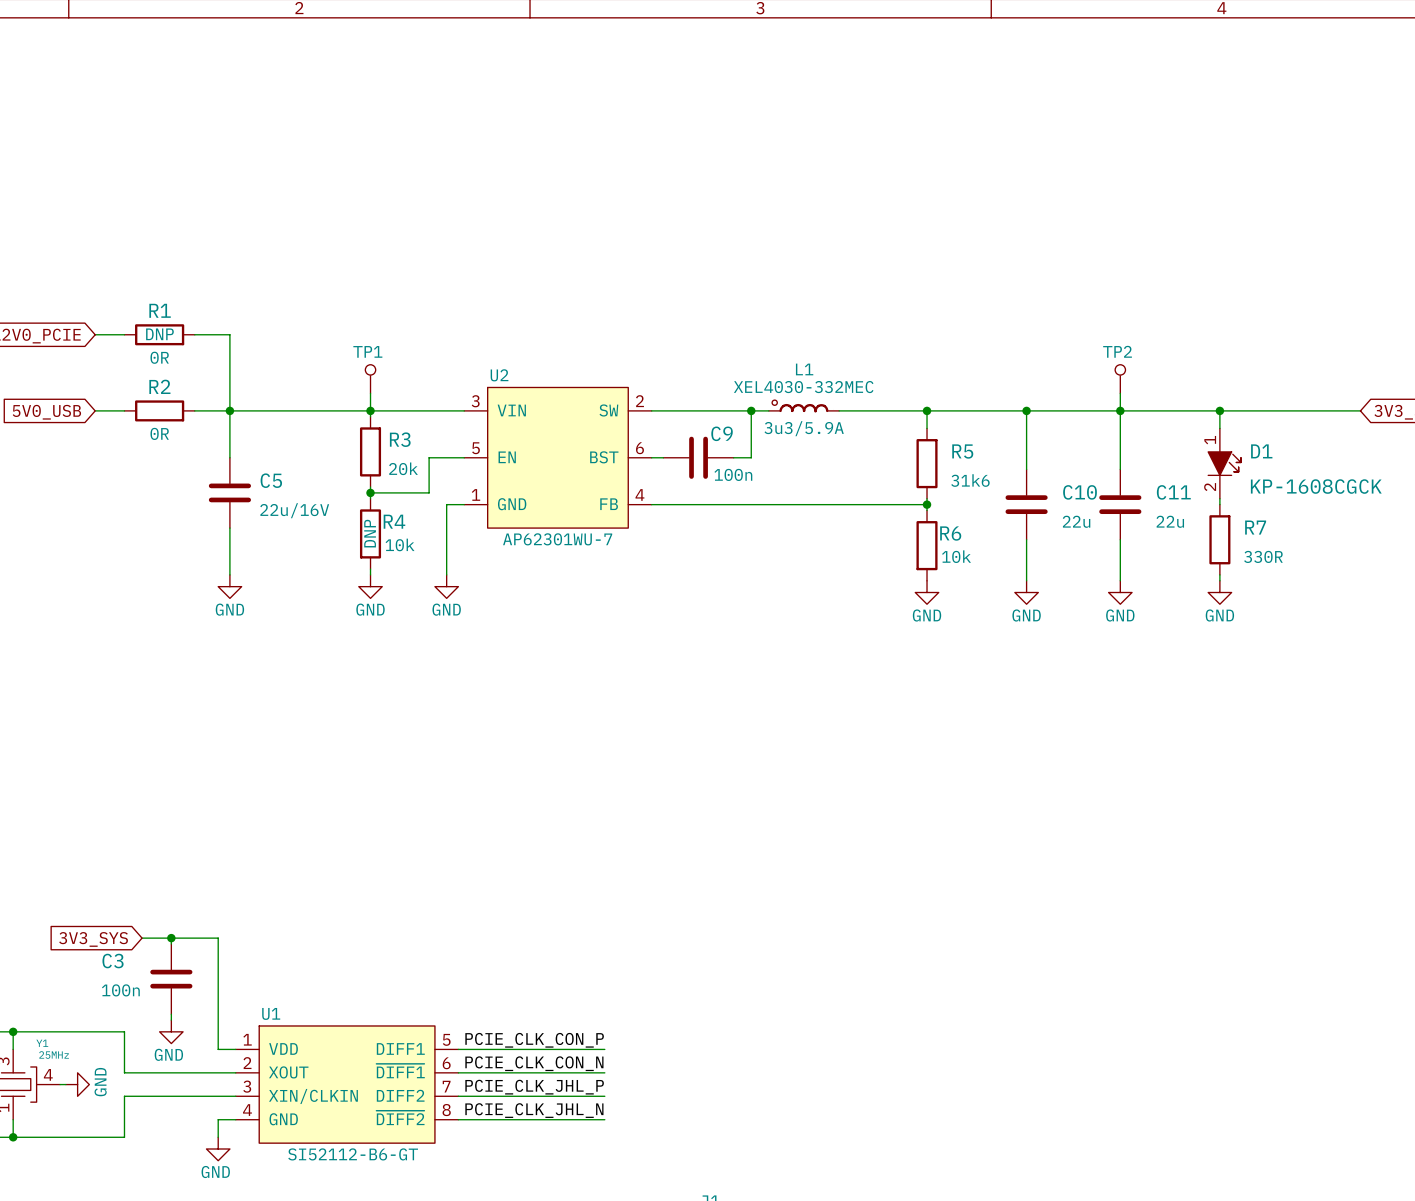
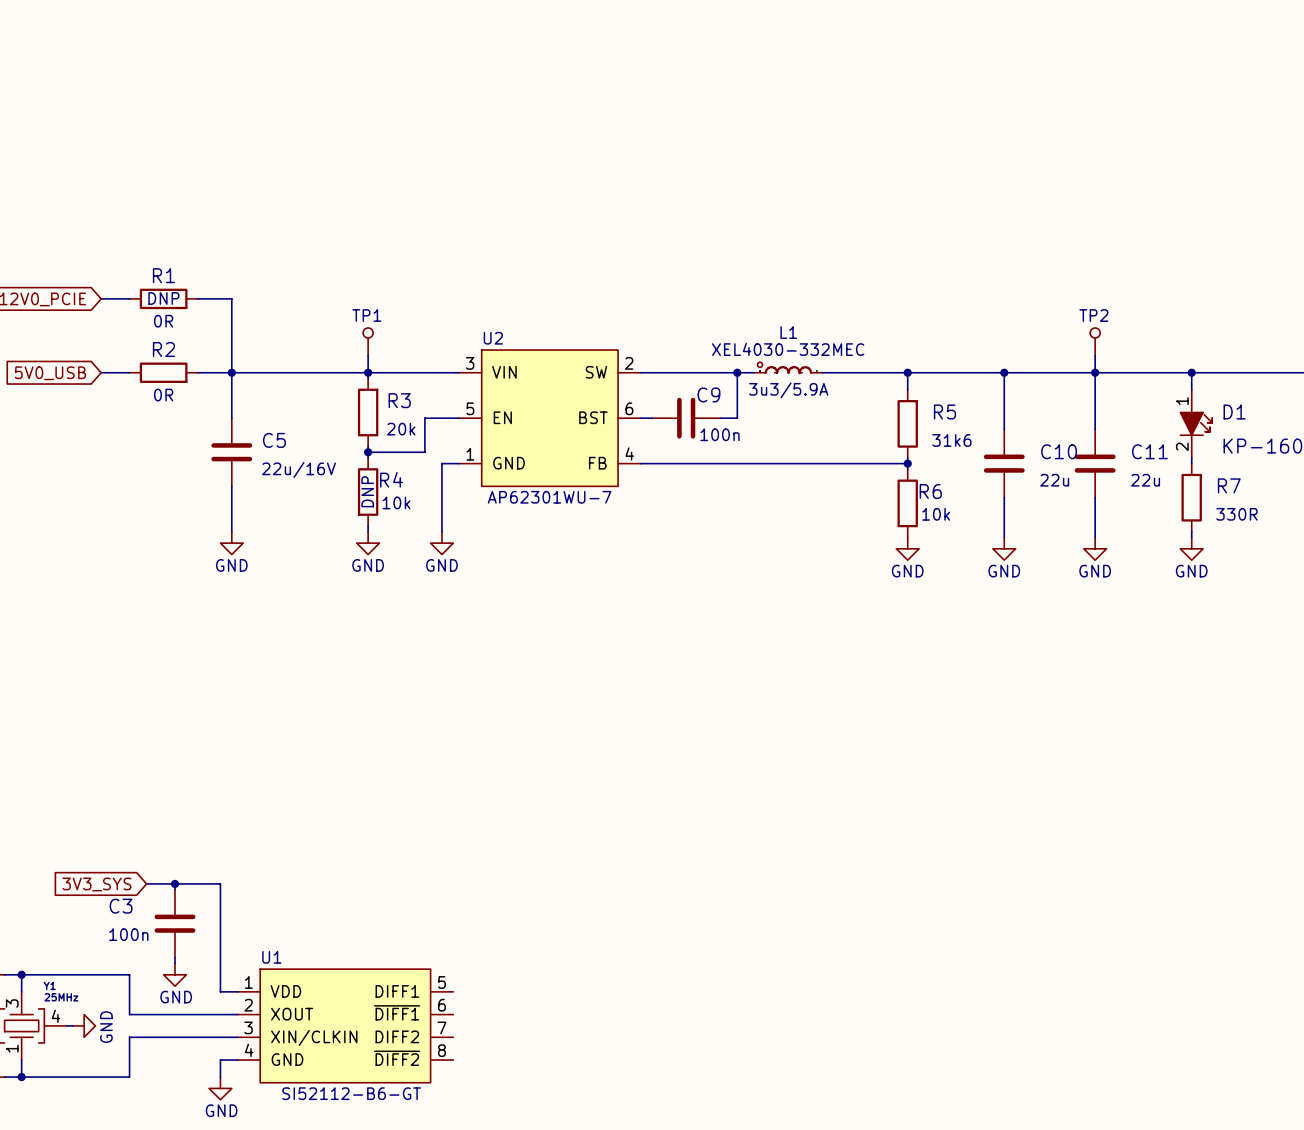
label: PCIE_CLK_CON_P (534, 1040) -> none
wire: (458, 1049) (604, 1049) -> none
label: PCIE_CLK_CON_N (534, 1063) -> none
wire: (458, 1072) (604, 1072) -> none
label: PCIE_CLK_JHL_P (534, 1087) -> none
wire: (458, 1096) (604, 1096) -> none
label: PCIE_CLK_JHL_N (534, 1110) -> none
wire: (458, 1119) (604, 1119) -> none

